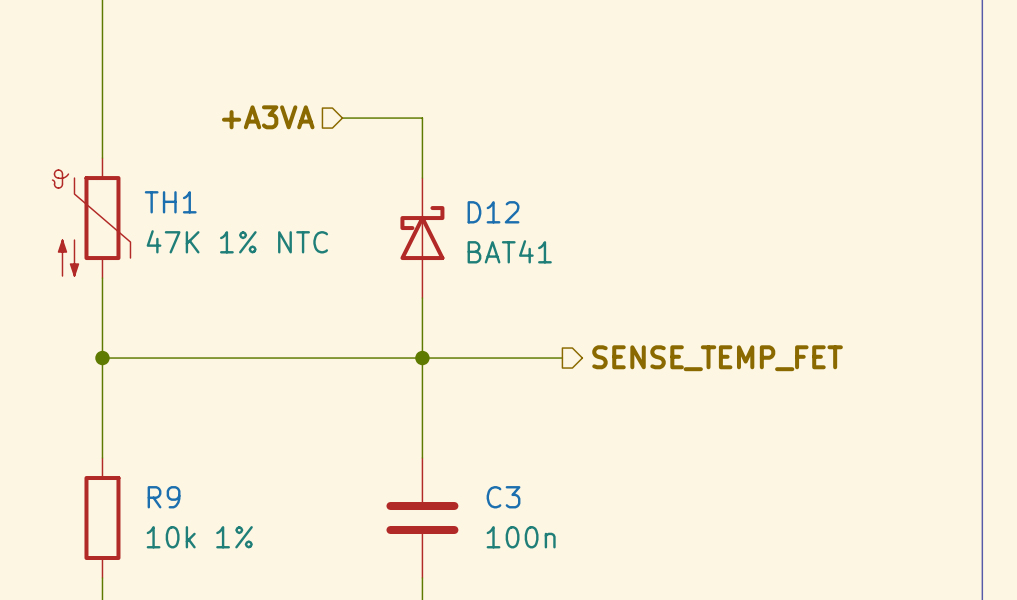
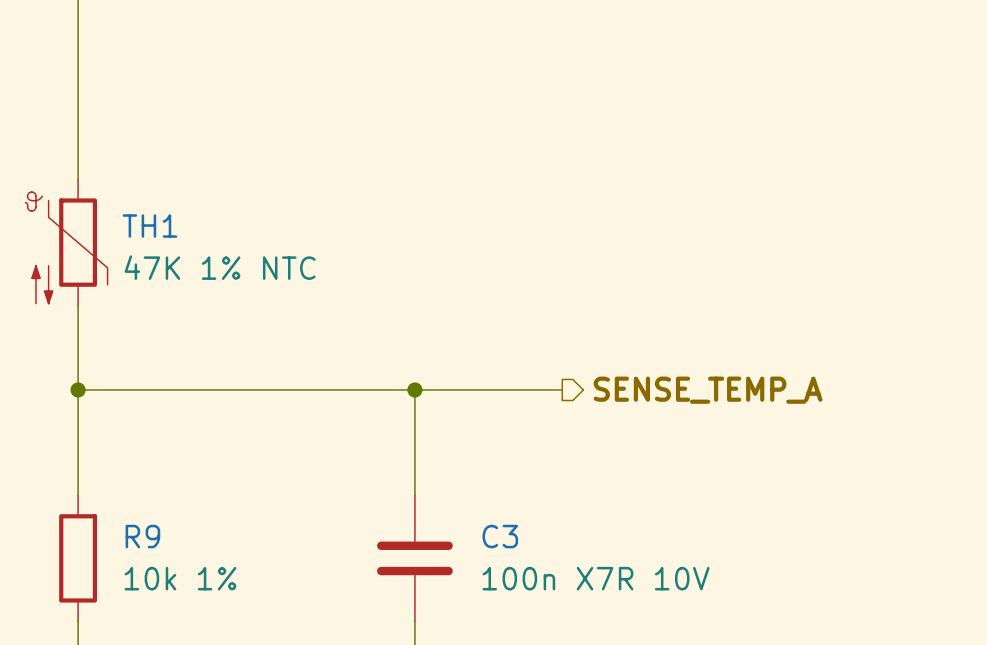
hierarchical label: +A3VA (268, 117) -> none
wire: (342, 118) (422, 118) (422, 178) -> none
D12: BAT41 (422, 238) -> none
wire: (422, 298) (422, 358) -> none
hierarchical label: SENSE_TEMP_FET (717, 358) -> SENSE_TEMP_A (708, 390)
C3 value: 100n (521, 537) -> 100n X7R 10V (596, 578)

